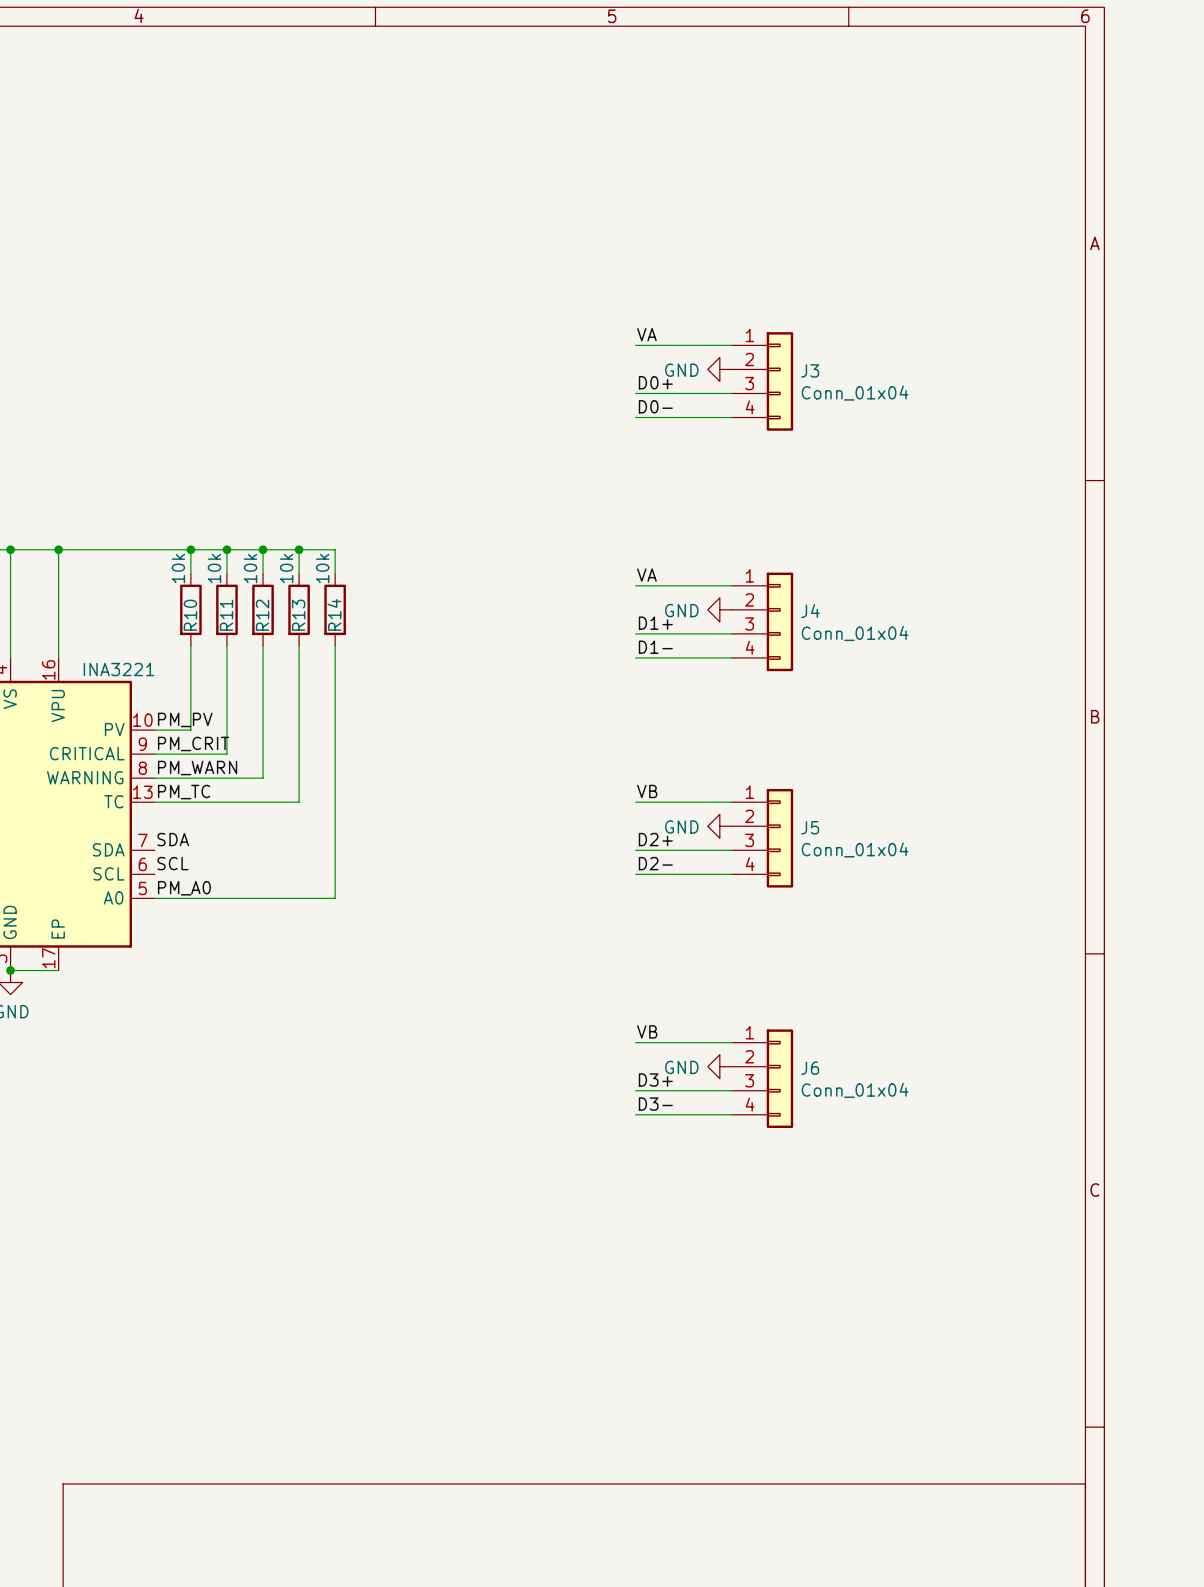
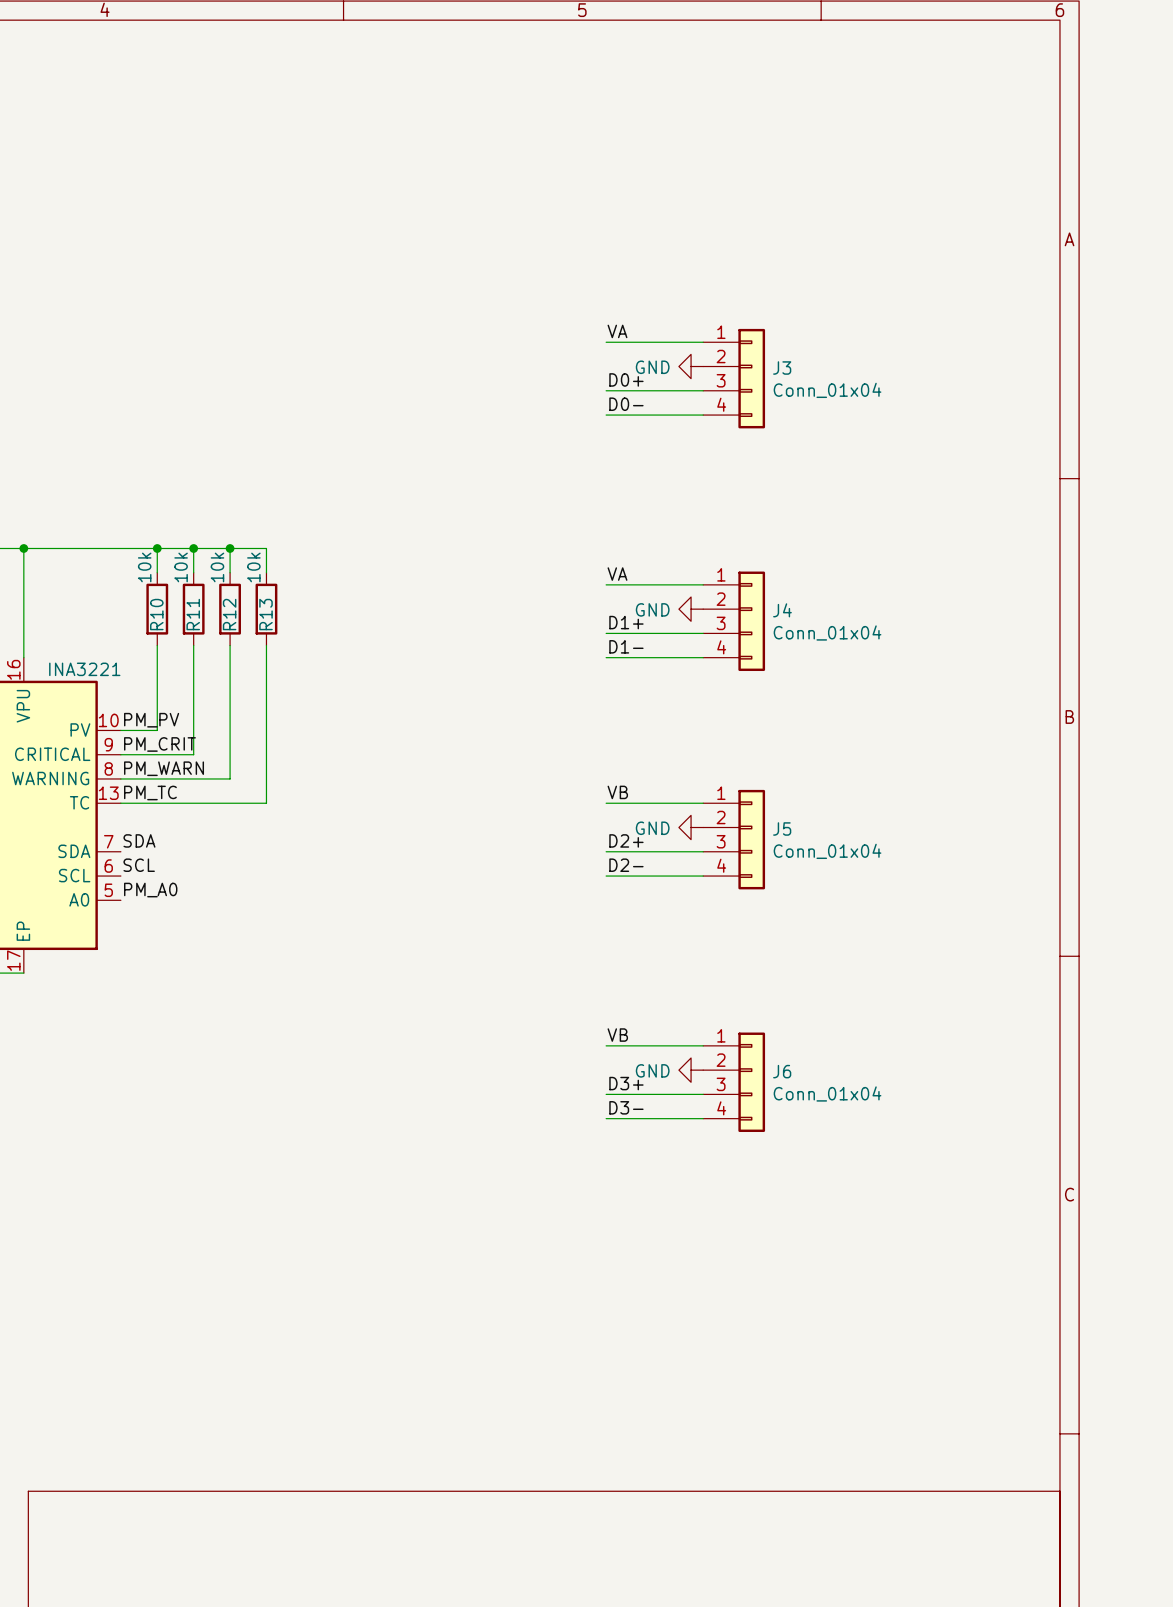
wire: (299, 549) (335, 549) (335, 573) -> none
junction: (299, 549) -> none
R14: 10k (335, 609) -> none
wire: (335, 645) (335, 898) (154, 898) -> none

